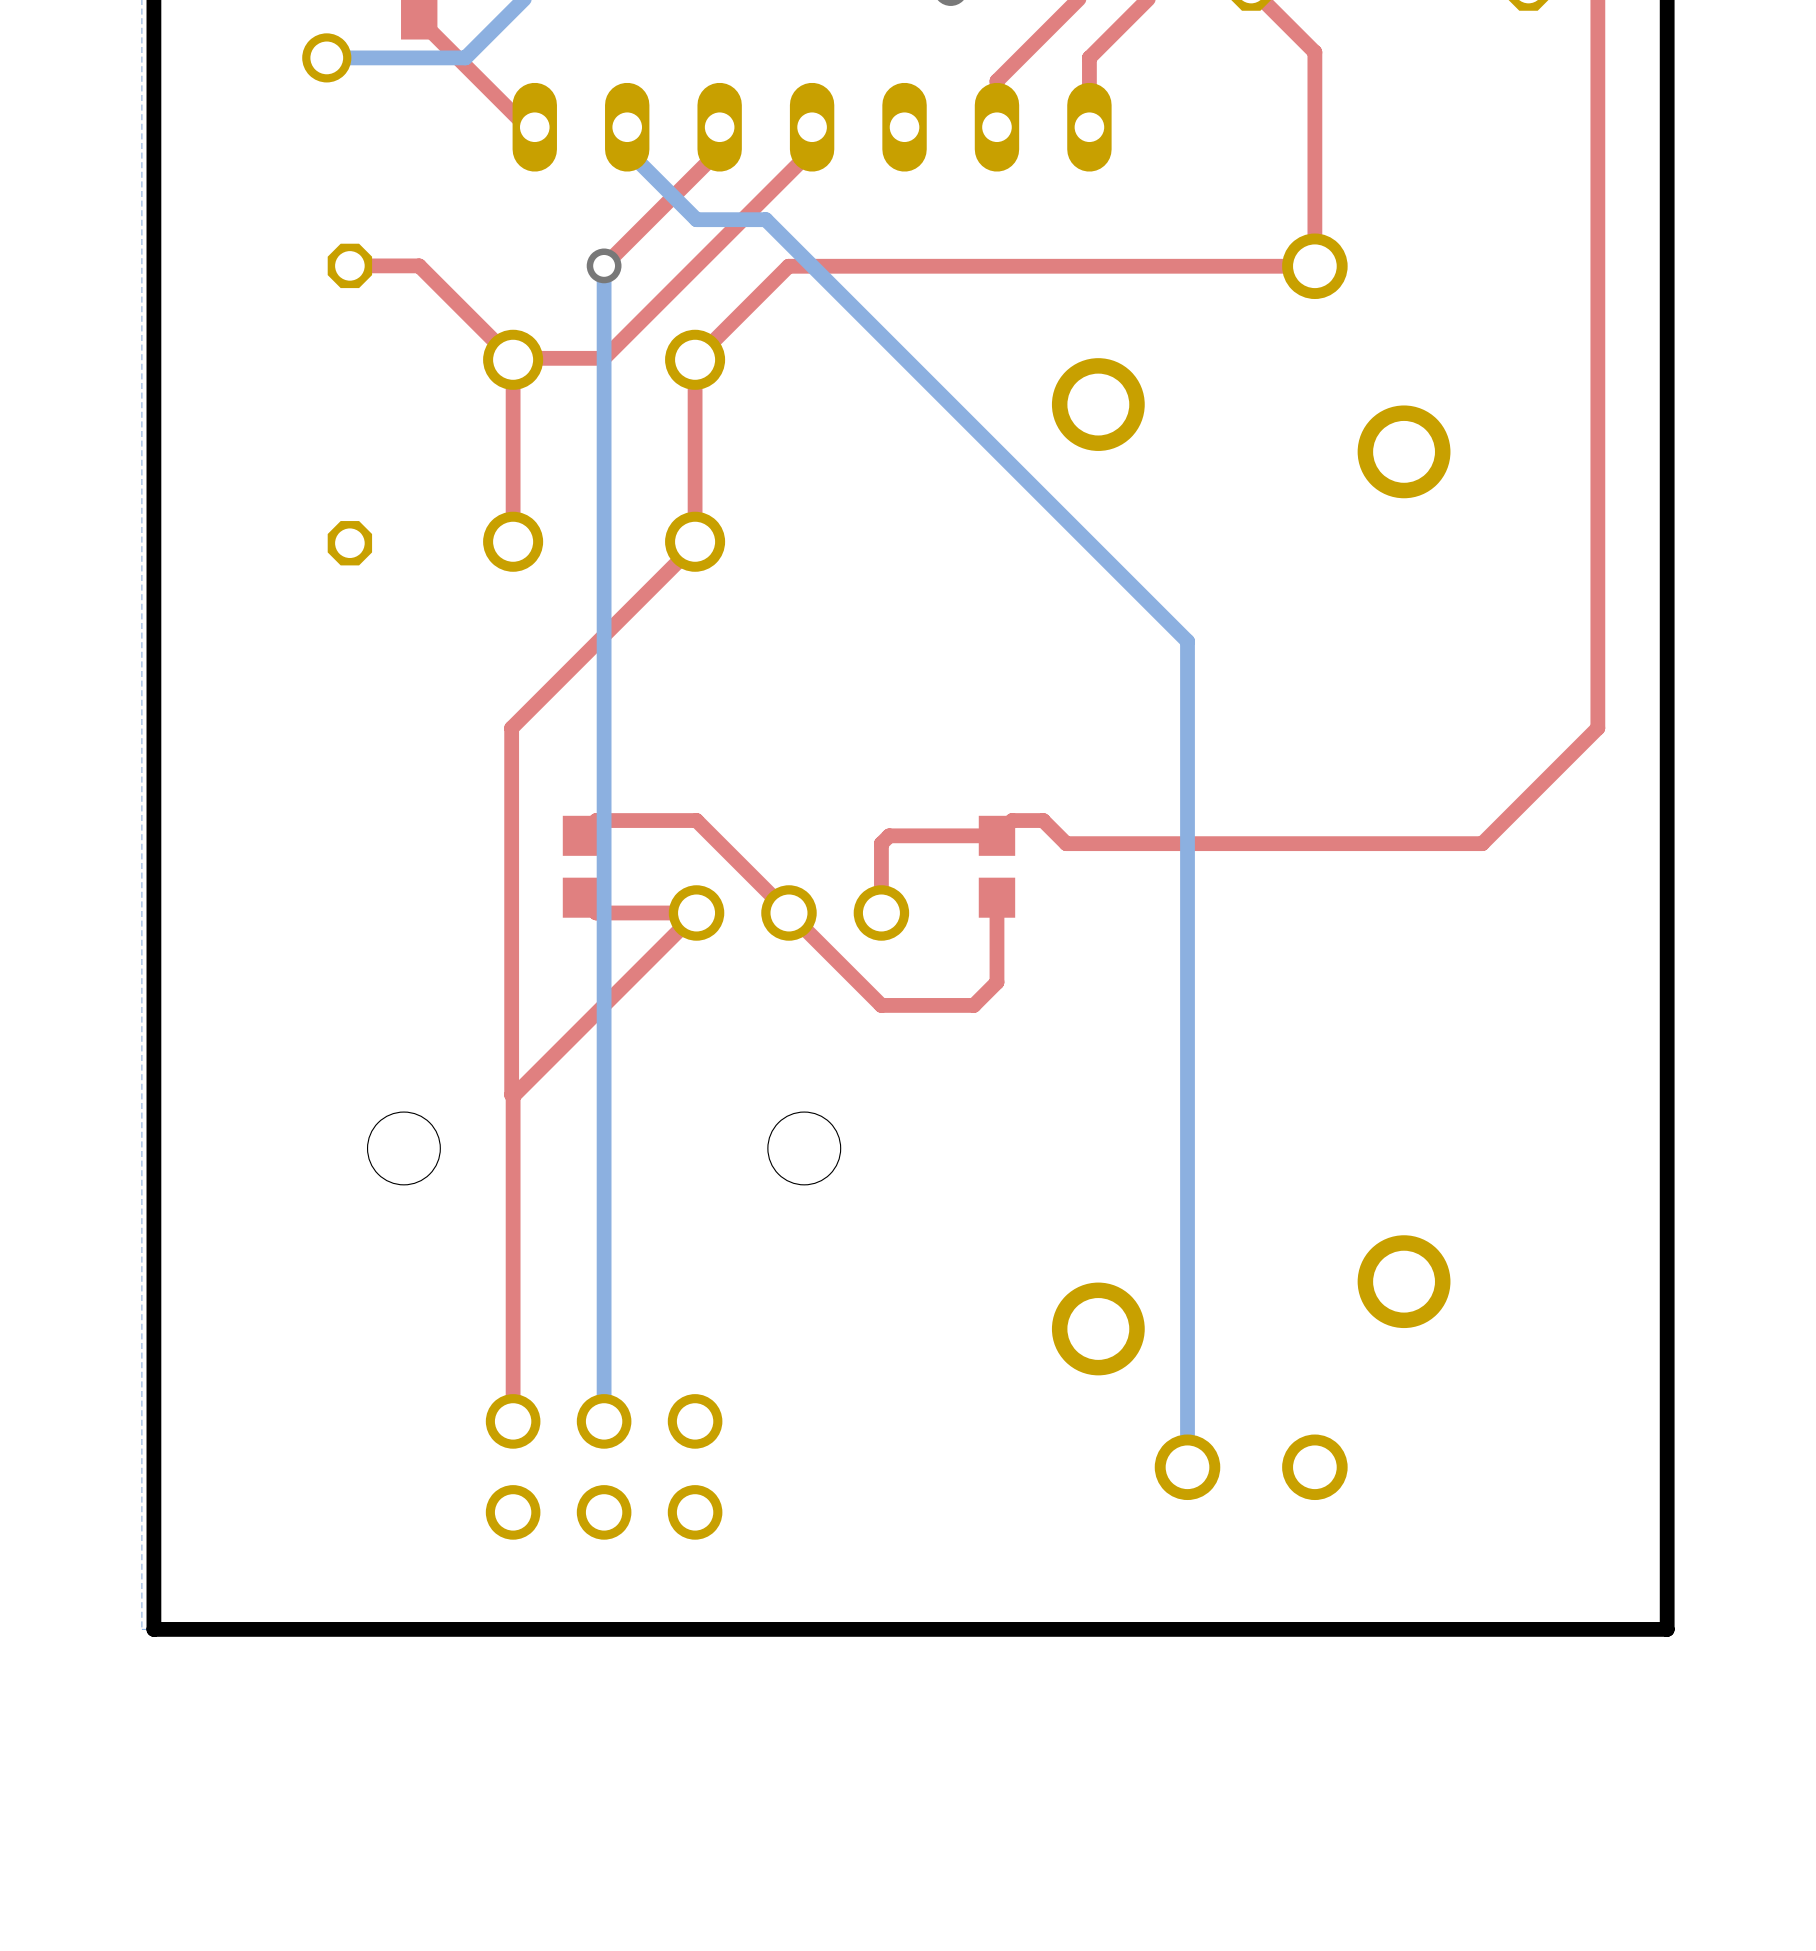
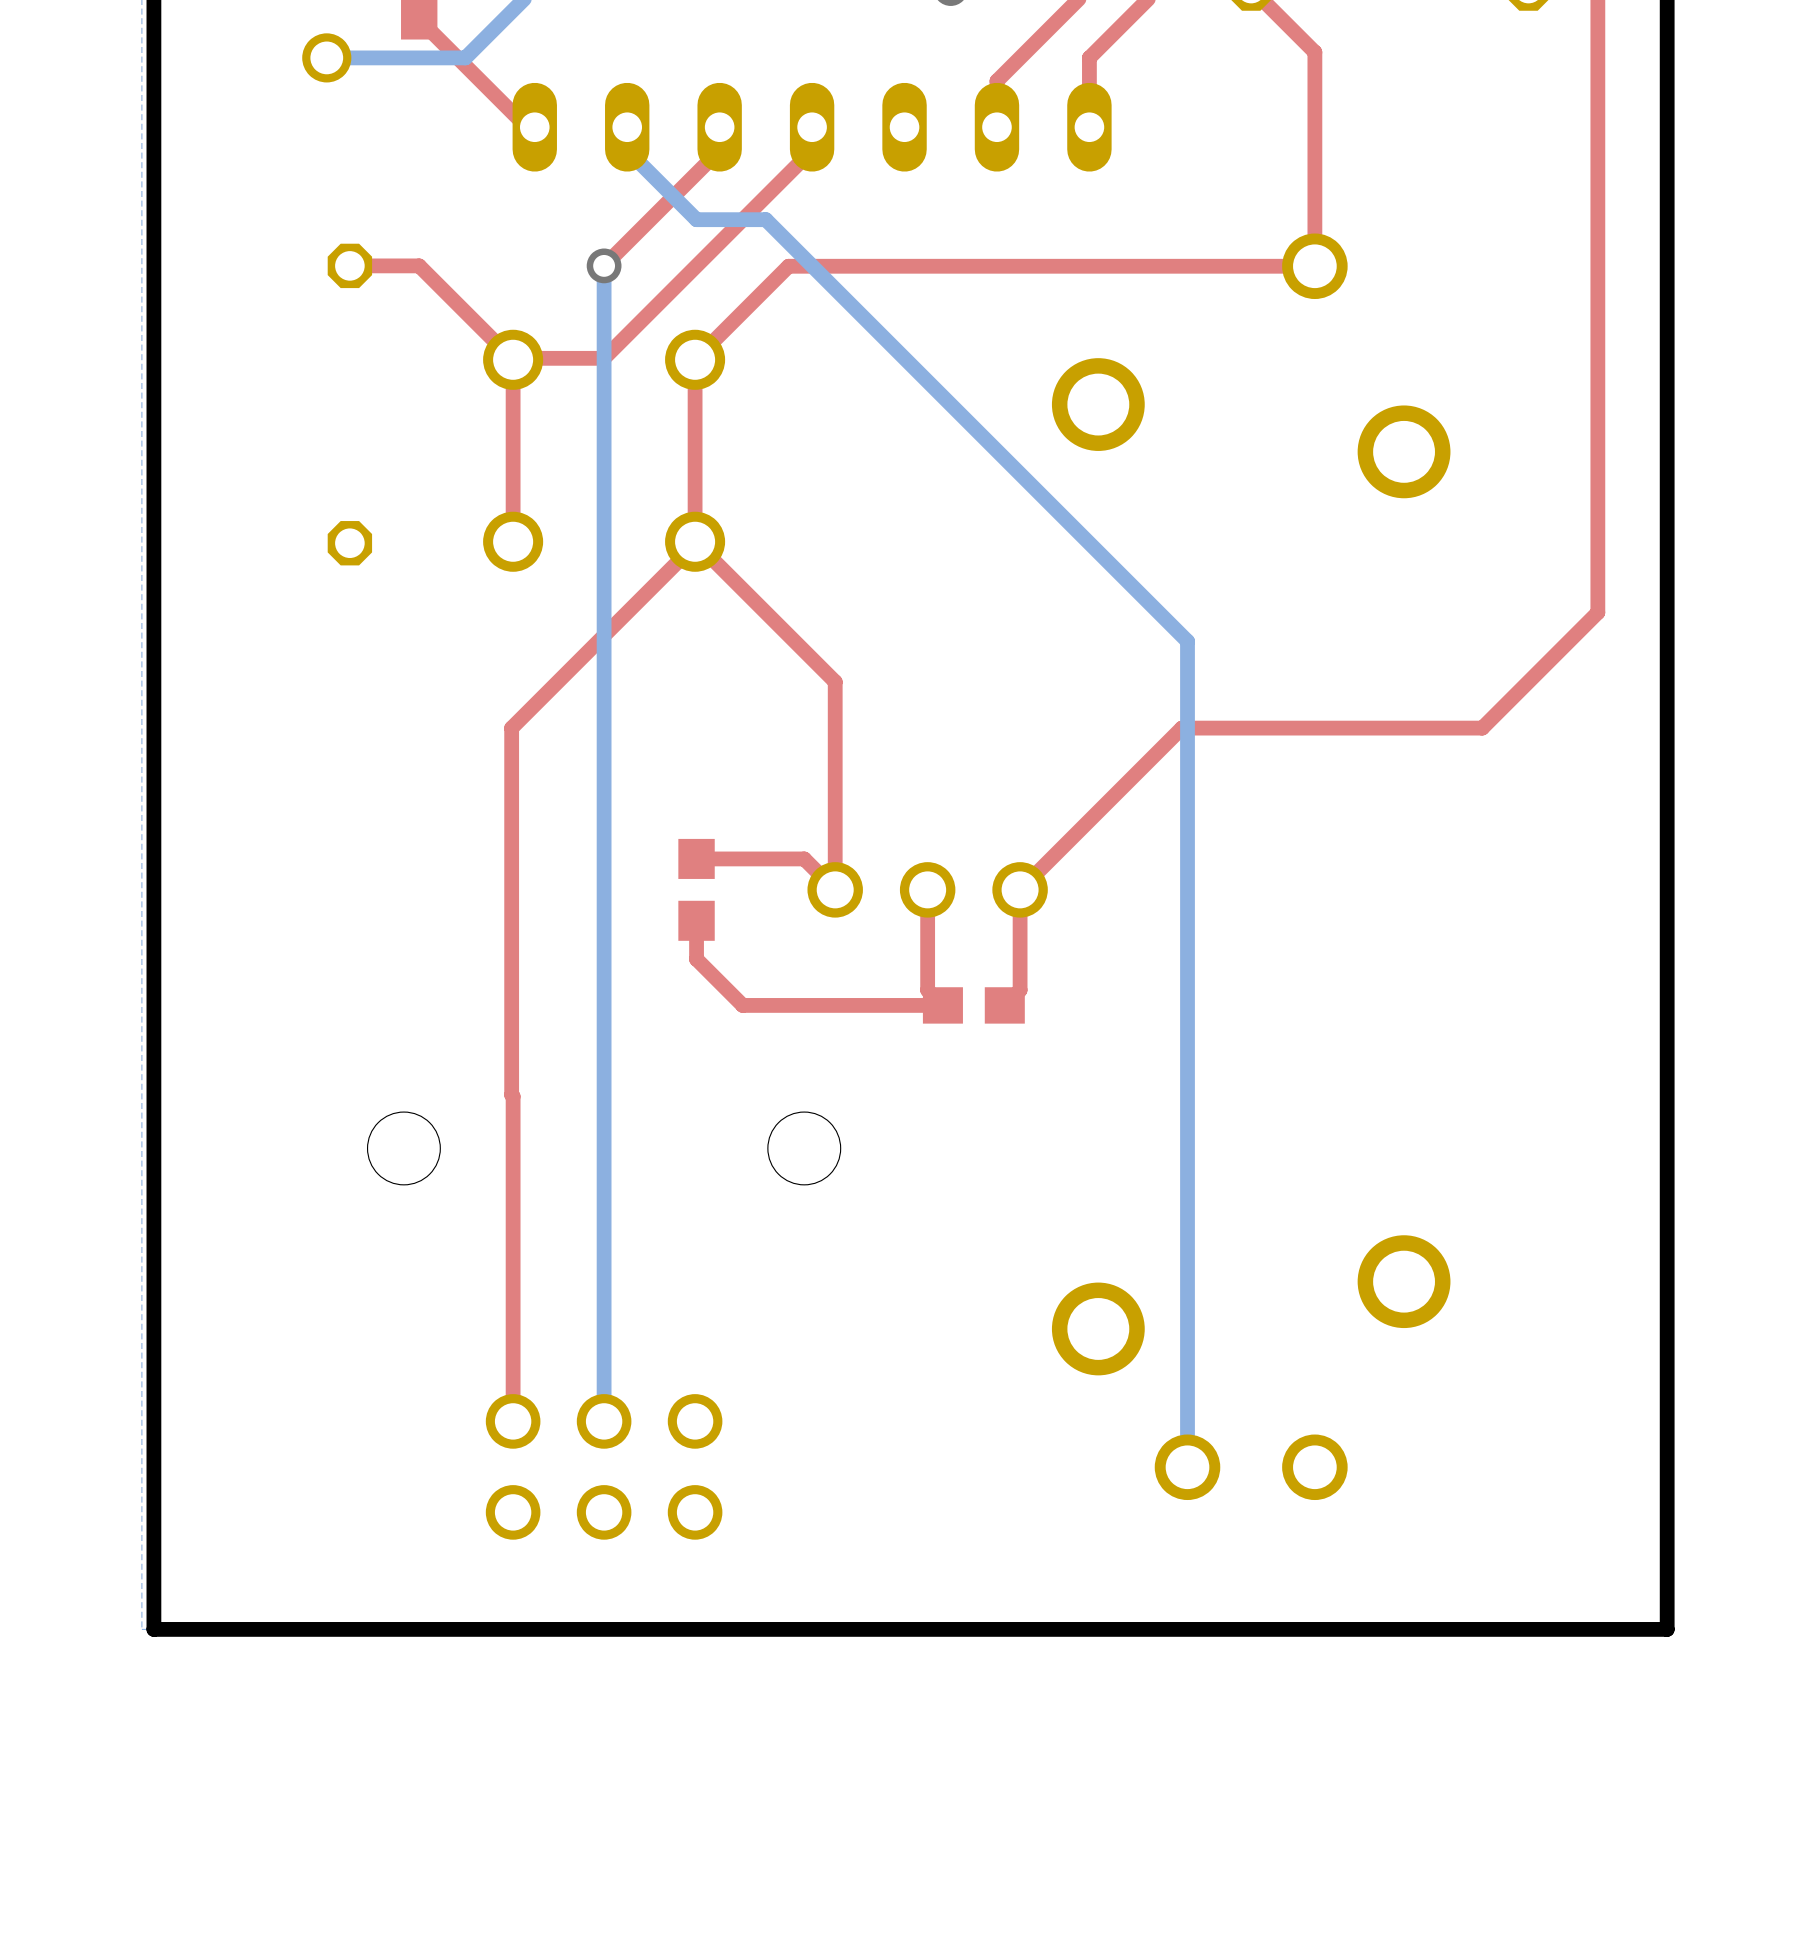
top track: none -> (695, 541) (835, 681) (835, 889) (804, 858) (696, 858)
top track: (1597, 612) (1597, 728) (1482, 843) (1066, 843) (1043, 820) (1012, 820) (996, 835) (889, 835) (881, 843) (881, 912) -> (1597, 612) (1482, 728) (1181, 728) (1020, 889) (1020, 990) (1004, 1005)
top track: (580, 835) (596, 820) (696, 820) (881, 1005) -> (696, 920) (696, 959) (742, 1005) (881, 1005)
part position: (580, 866) -> (696, 889)
part rotation: 0° (996, 866) -> 90° clockwise (973, 1005)
part position: (996, 866) -> (973, 1005)
top track: (580, 897) (596, 912) (696, 912) (513, 1096) -> none
top track: (996, 897) (996, 982) (973, 1005) (942, 1005) -> (927, 889) (927, 990) (942, 1005)
part position: (788, 912) -> (927, 889)

